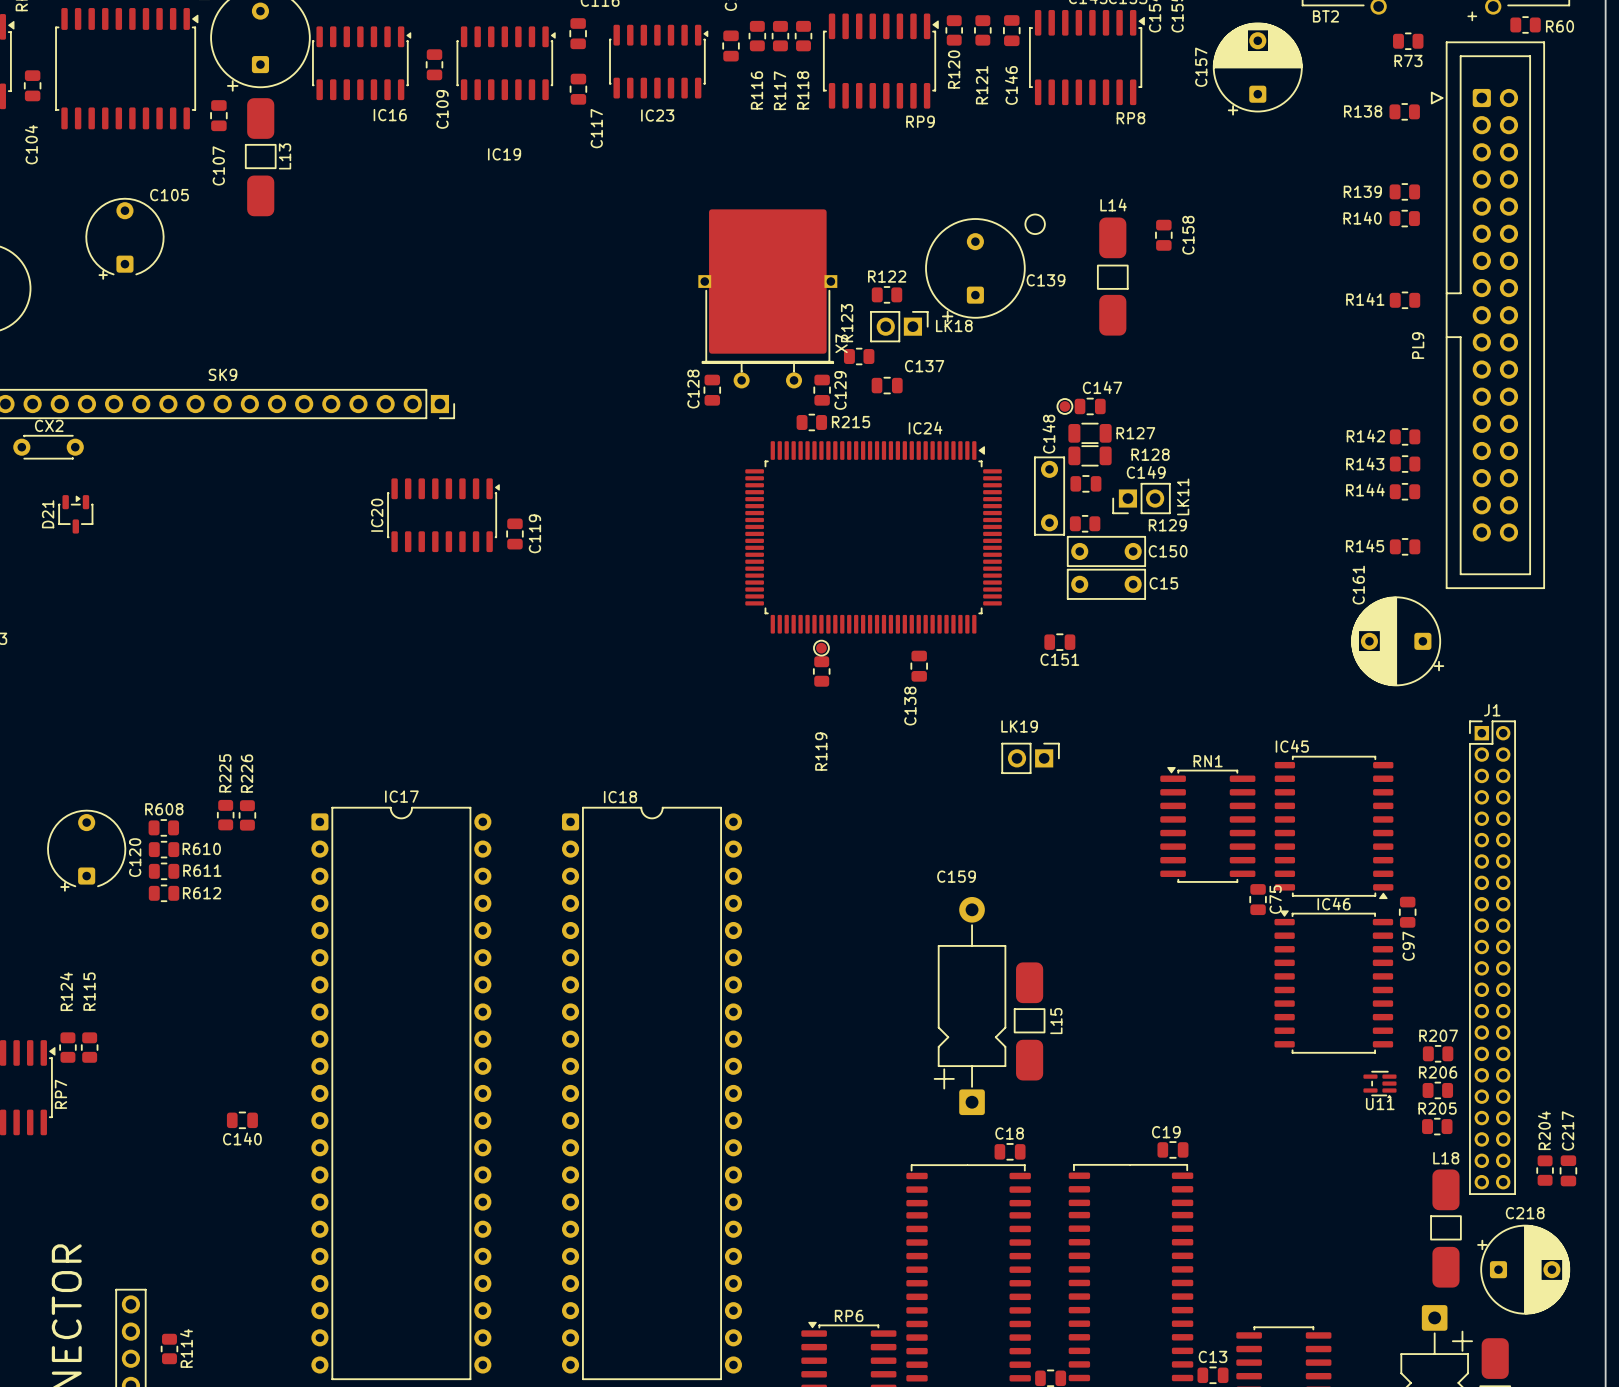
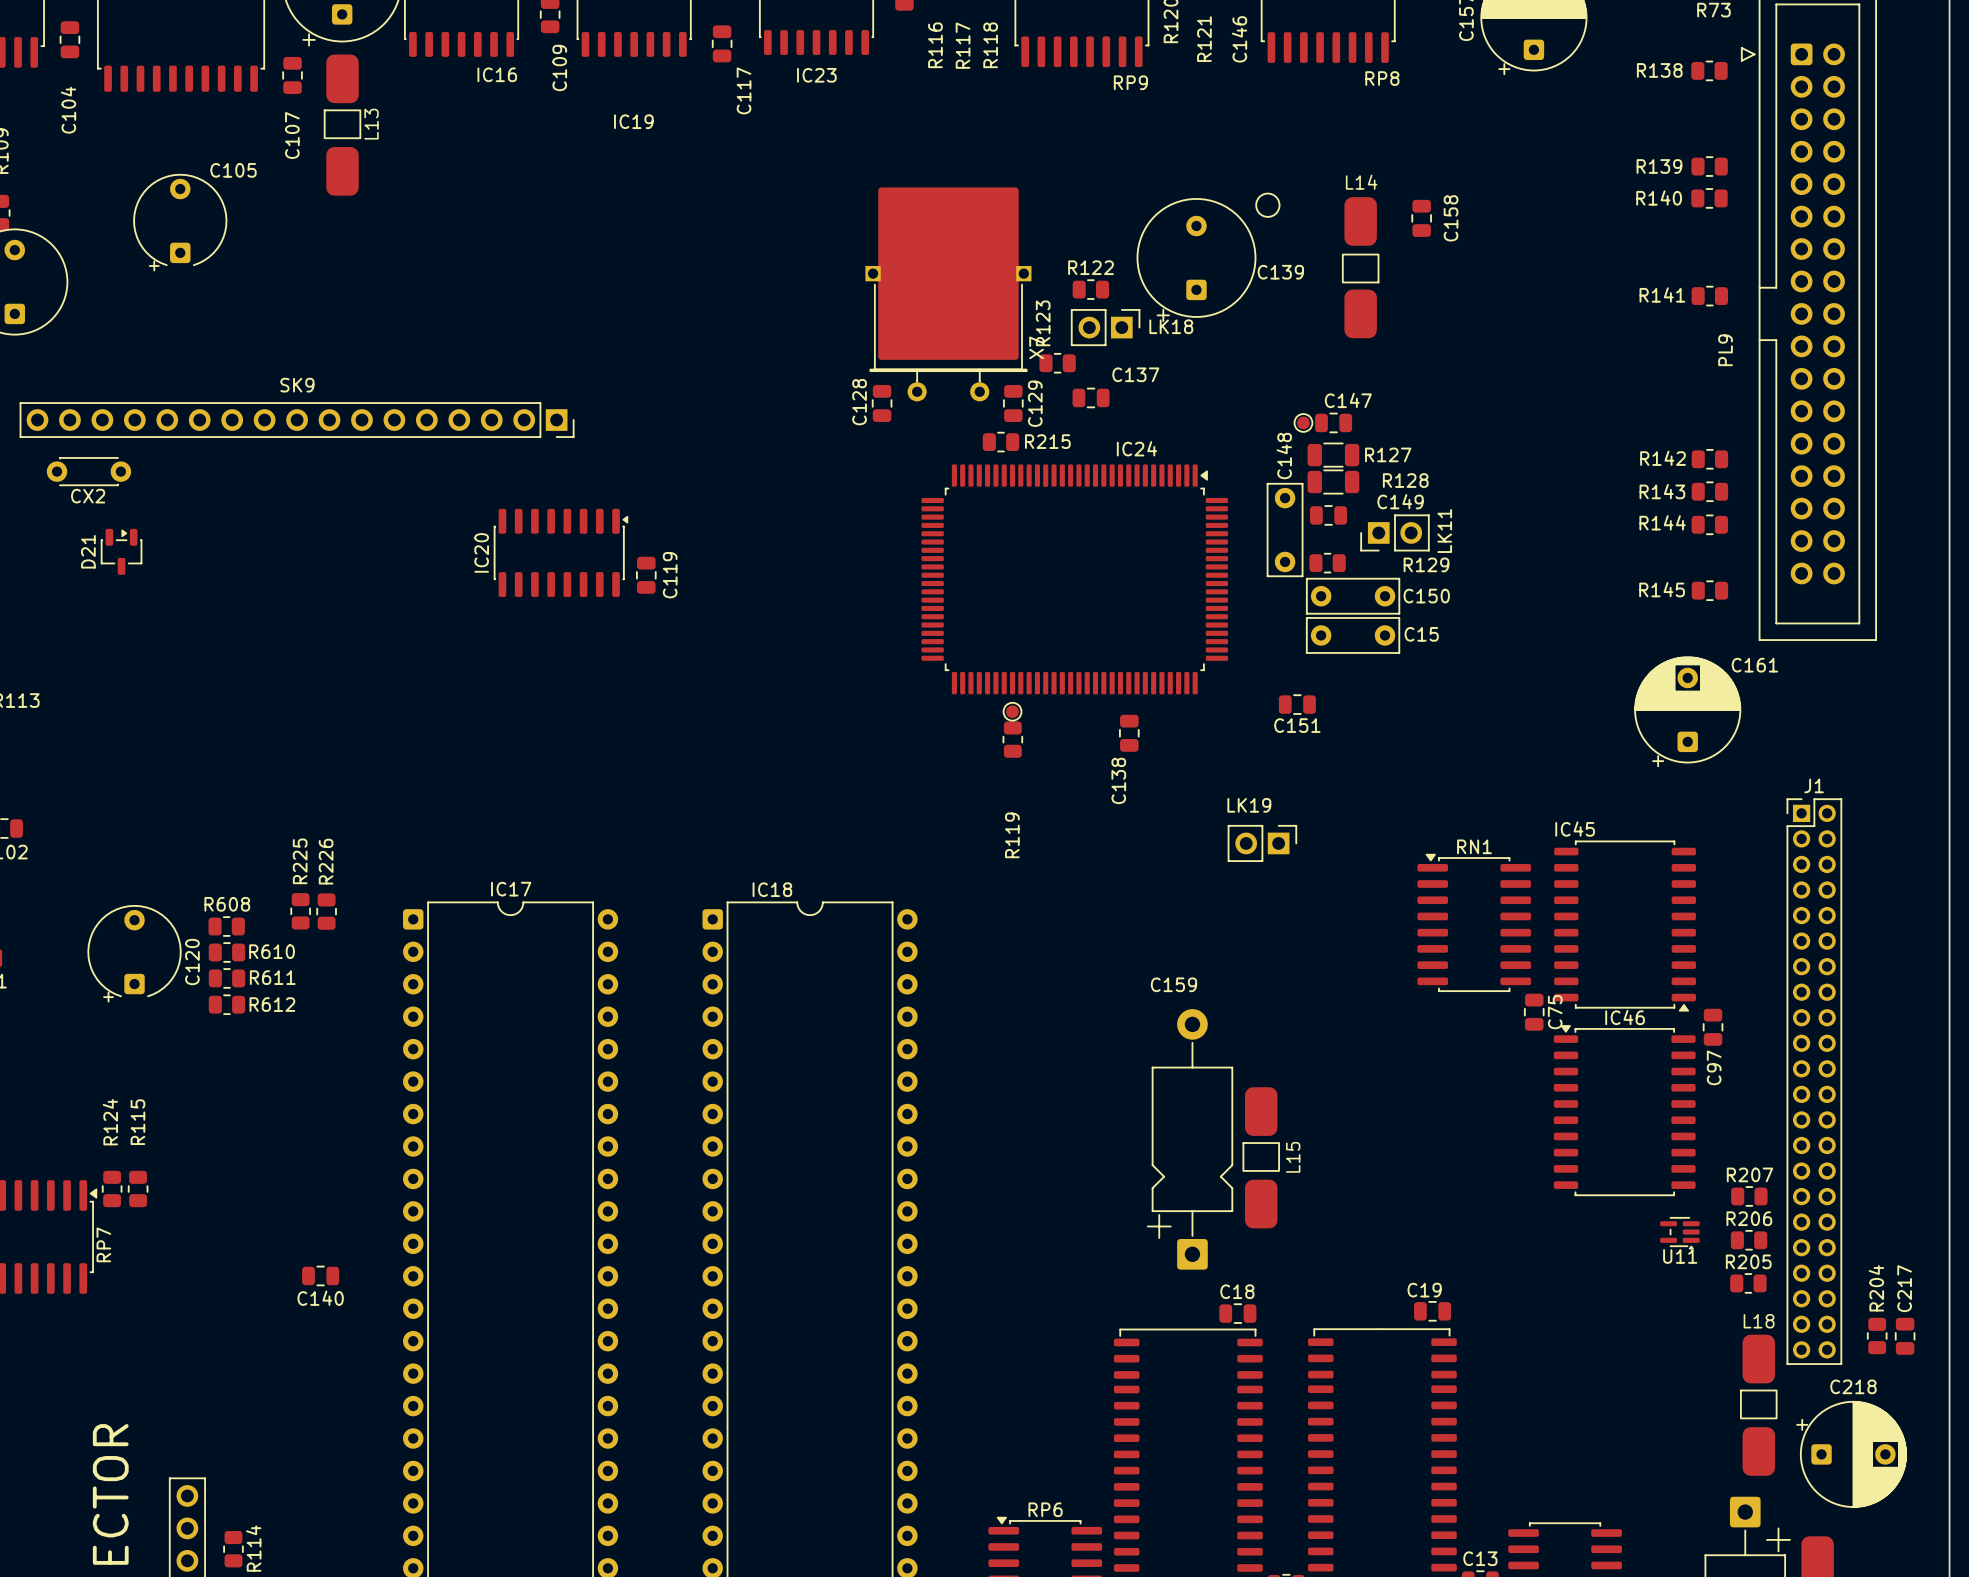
CX2 name position: CX2 (49, 425) -> CX2 (88, 496)
C161 rotation: 0° (1397, 641) -> 90° clockwise (1687, 711)

